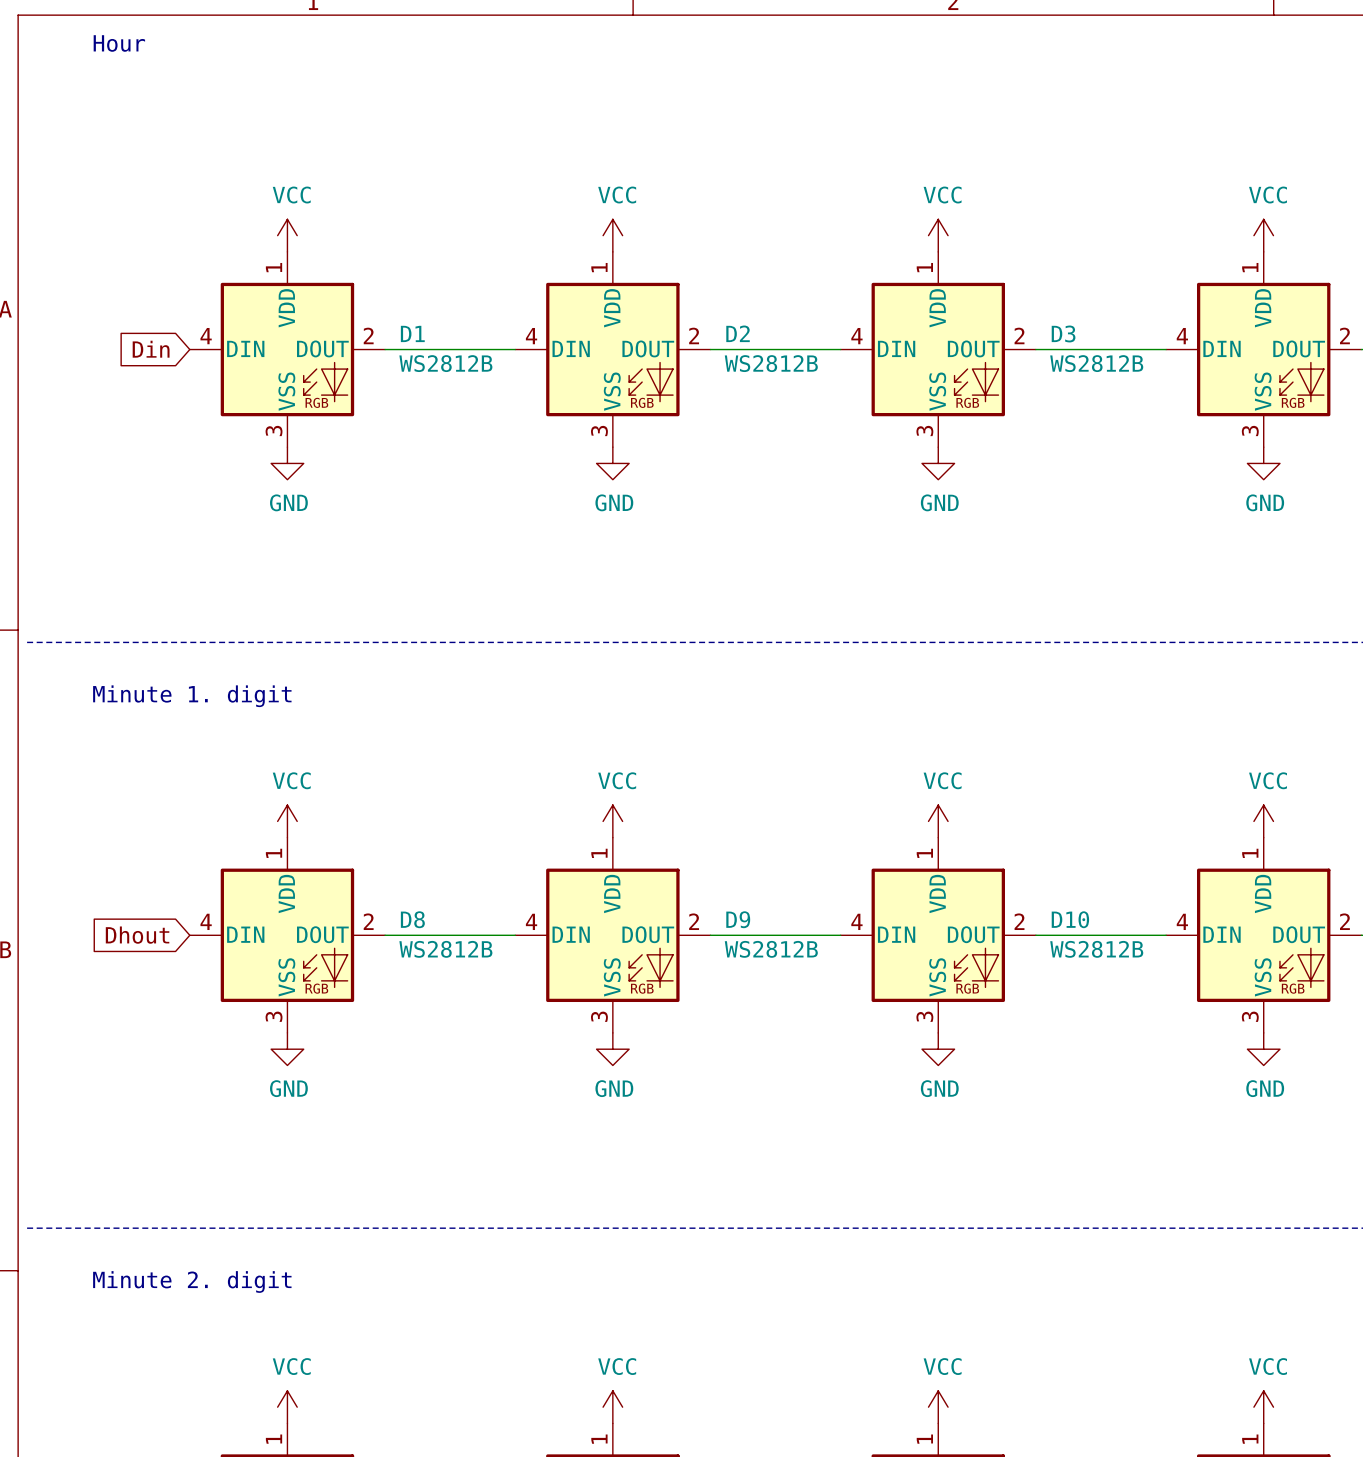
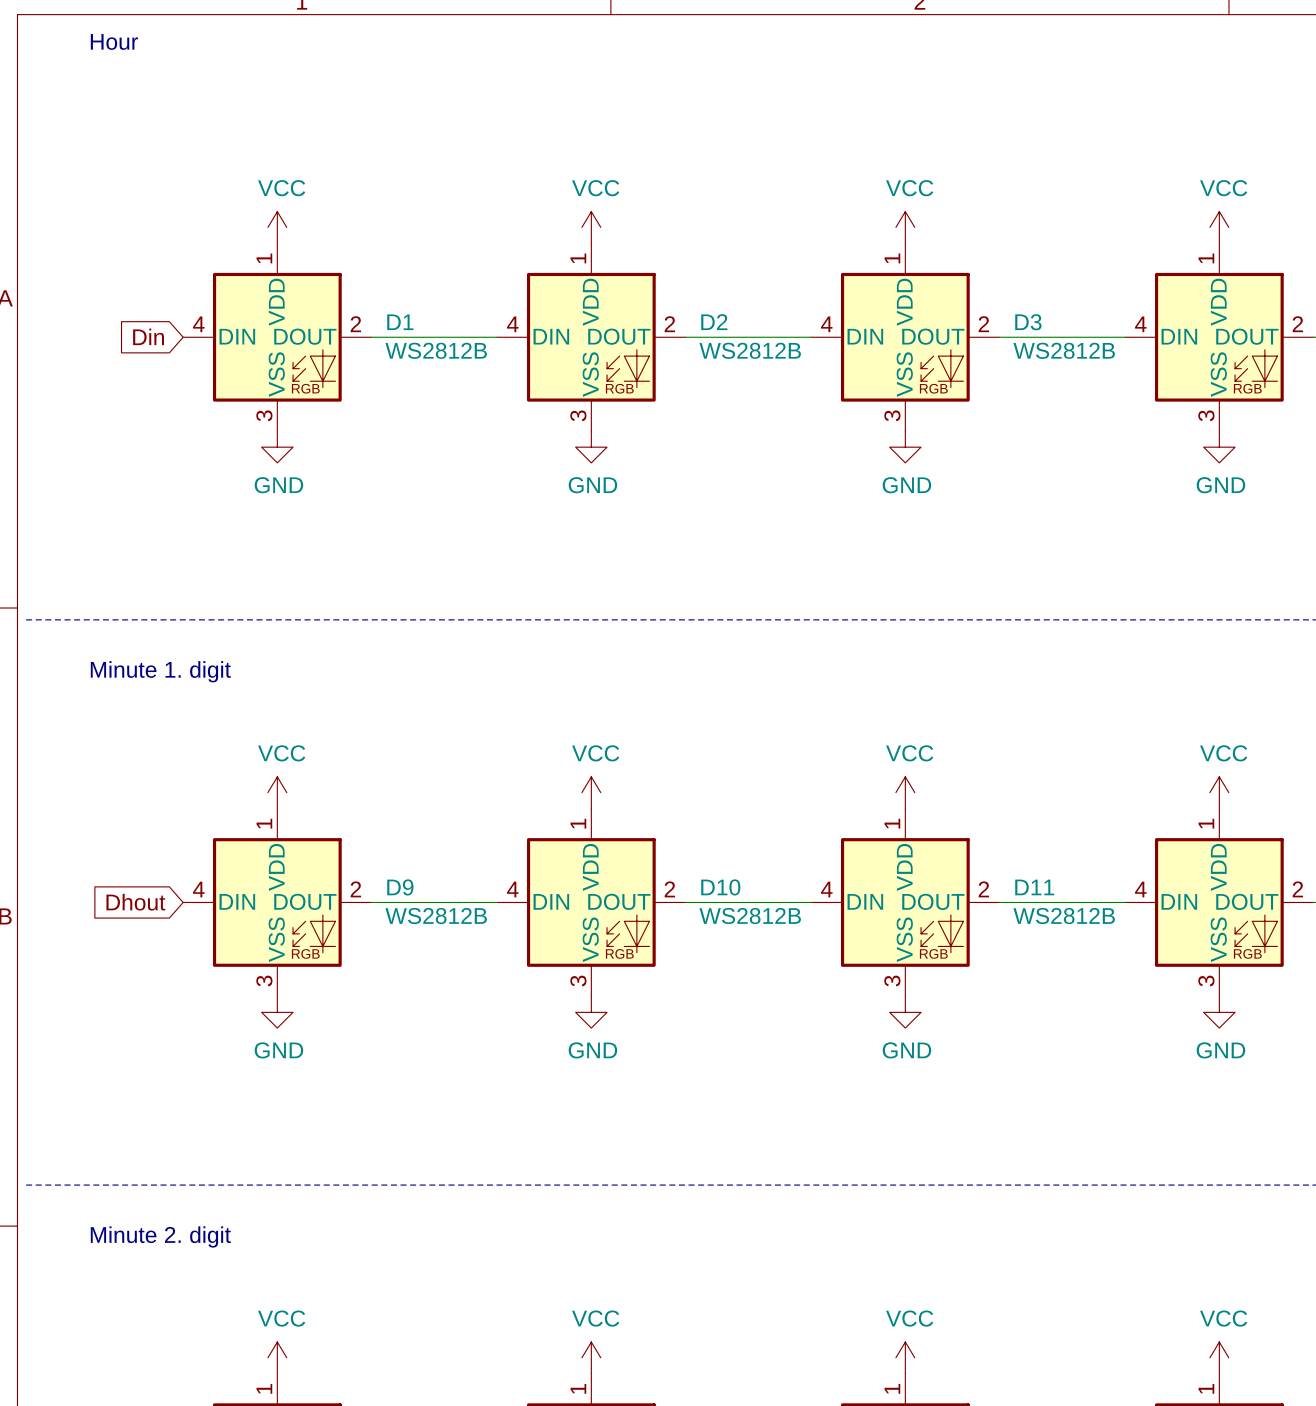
D8 name: D8 (412, 919) -> D9 (400, 887)
D9 name: D9 (738, 919) -> D10 (720, 887)
D10 name: D10 (1070, 919) -> D11 (1034, 887)

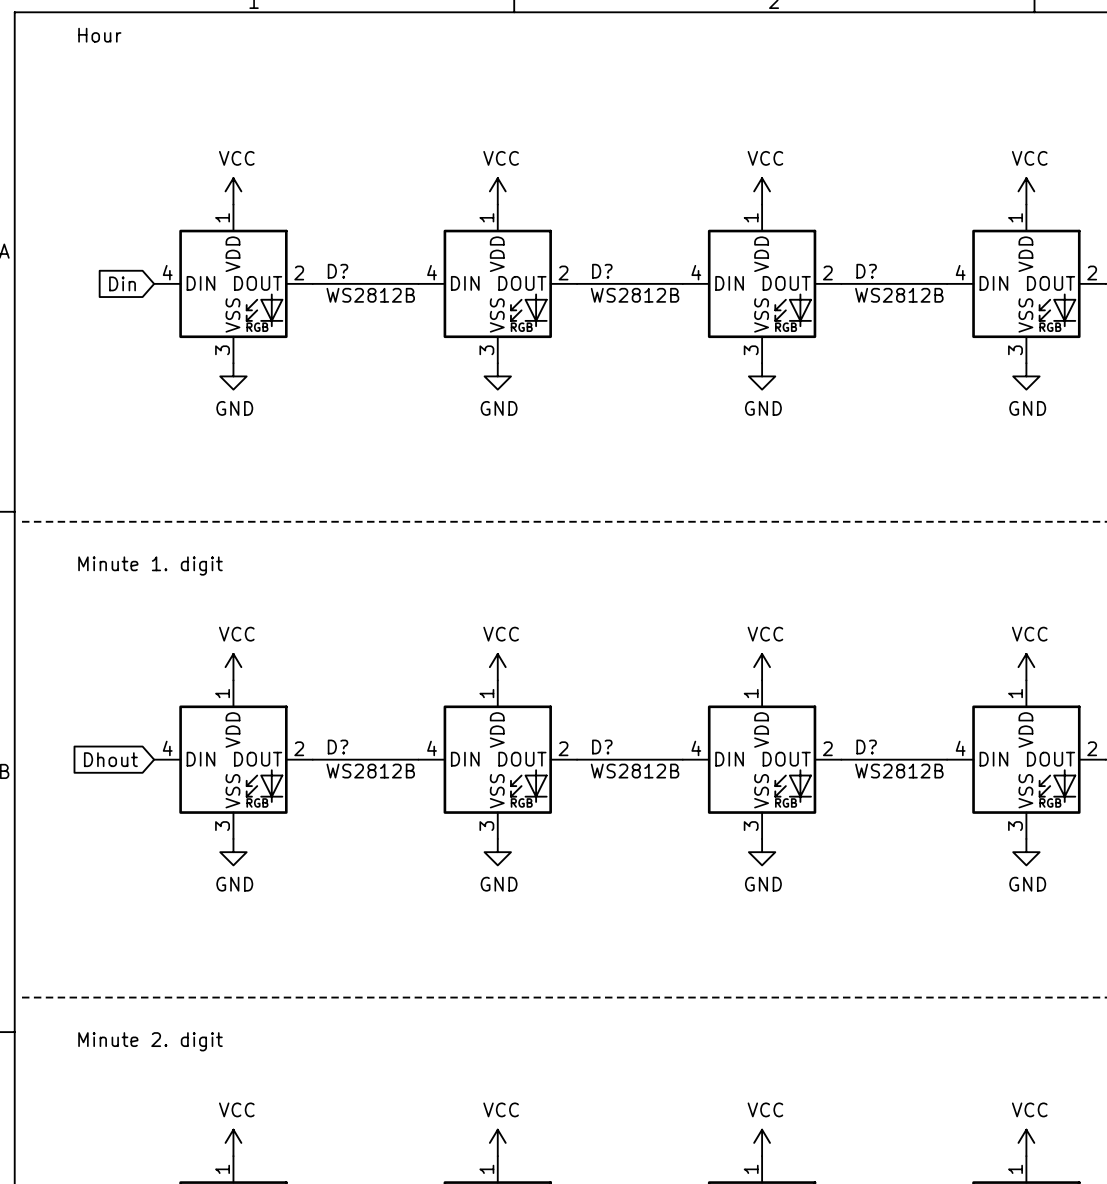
D1 name: D1 (400, 322) -> D? (338, 271)
D2 name: D2 (714, 322) -> D? (602, 271)
D3 name: D3 (1028, 322) -> D? (866, 271)
D9 name: D9 (400, 887) -> D? (338, 747)
D10 name: D10 (720, 887) -> D? (602, 747)
D11 name: D11 (1034, 887) -> D? (866, 747)

